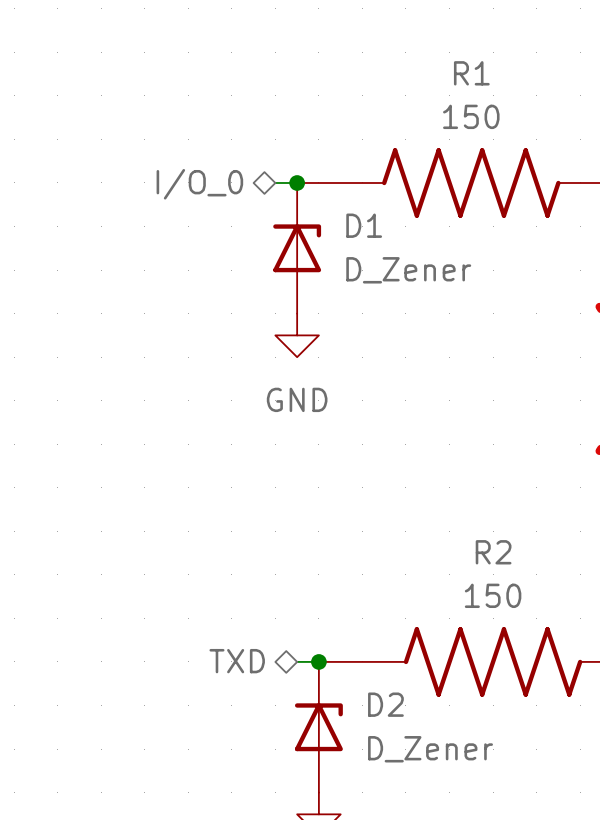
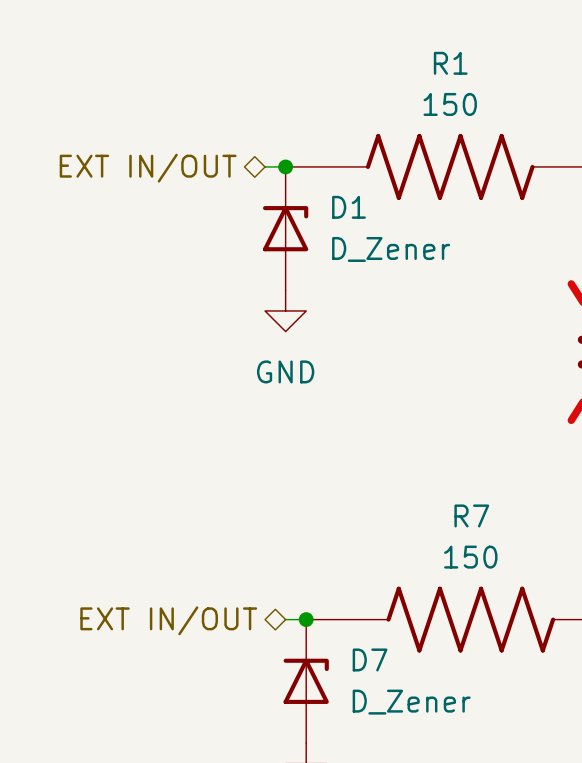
hierarchical label: I/O_0 (199, 184) -> EXT IN/OUT (148, 168)
R2 name: R2 (493, 552) -> R7 (471, 515)
hierarchical label: TXD (237, 661) -> EXT IN/OUT (168, 620)
D2 name: D2 (385, 704) -> D7 (370, 659)

